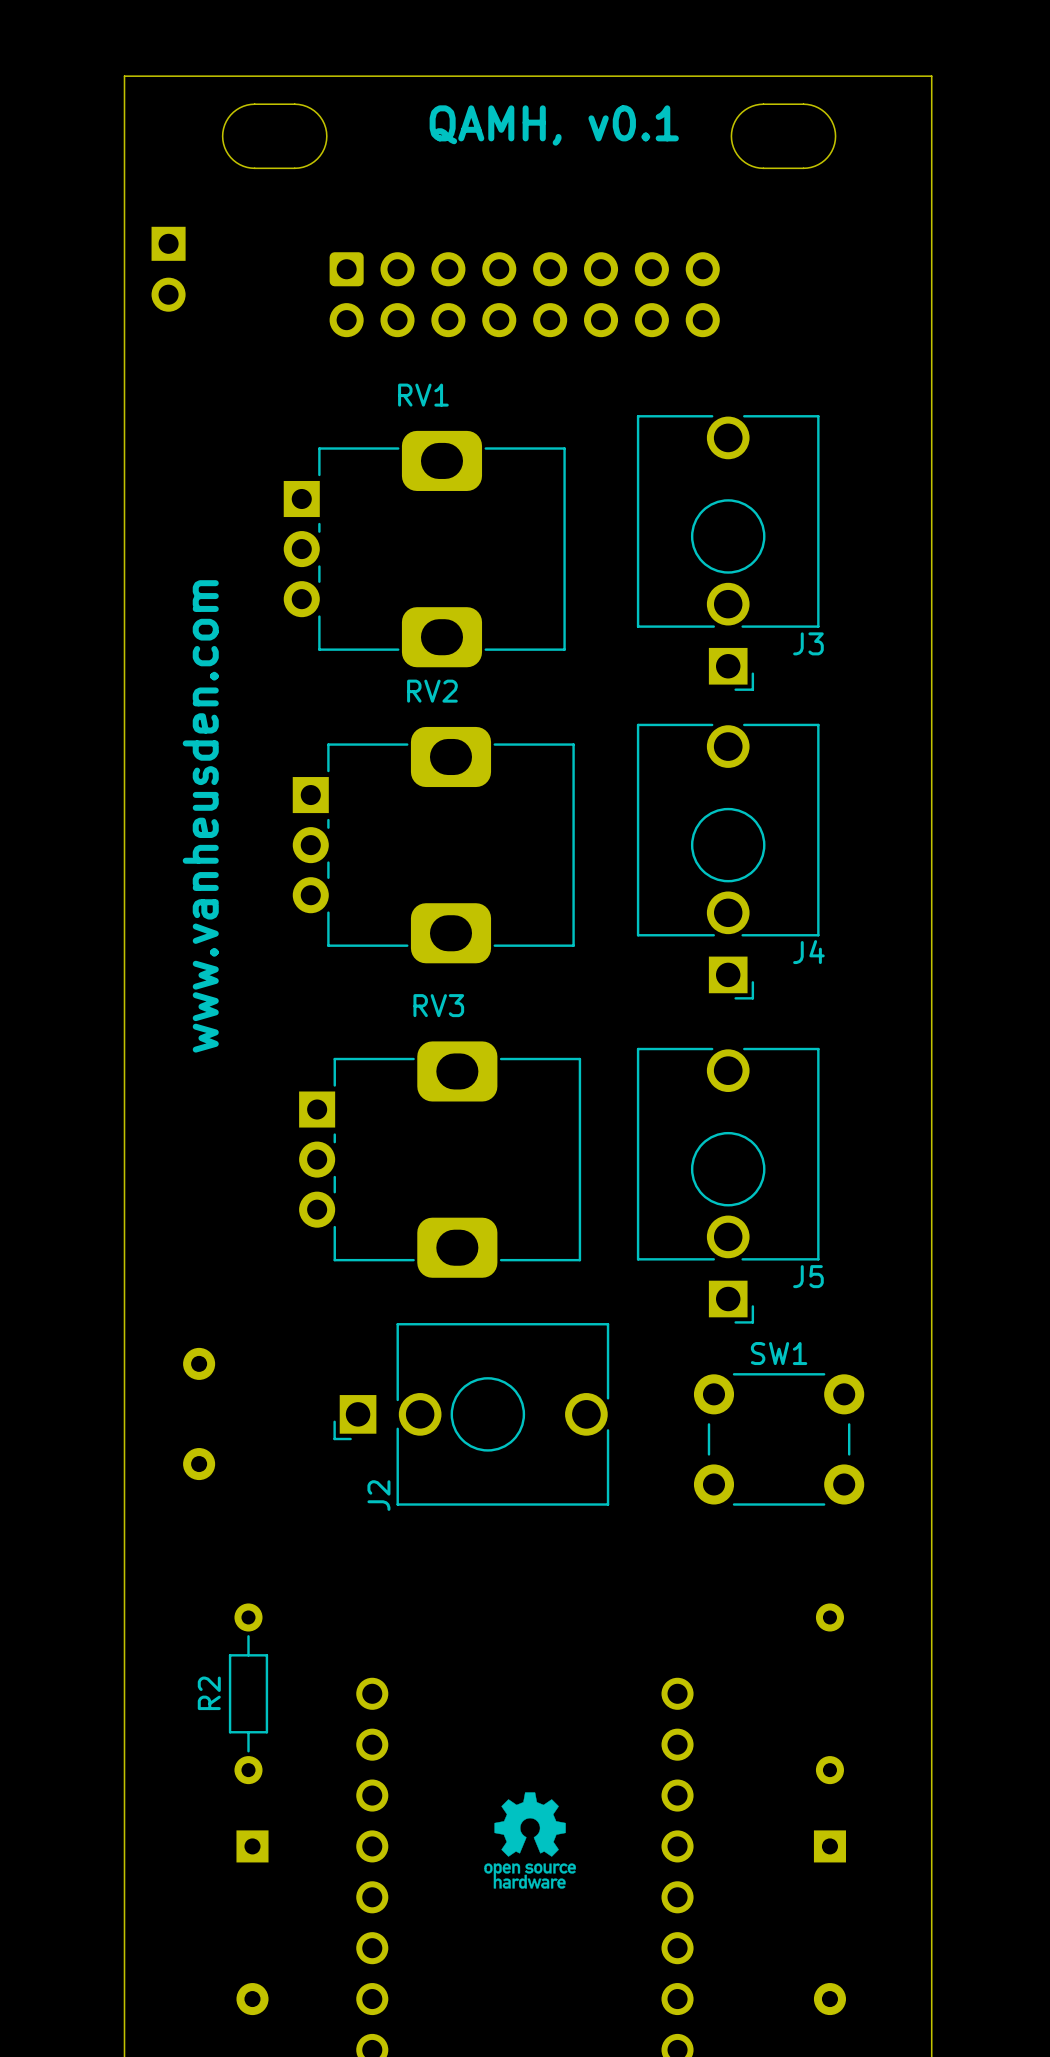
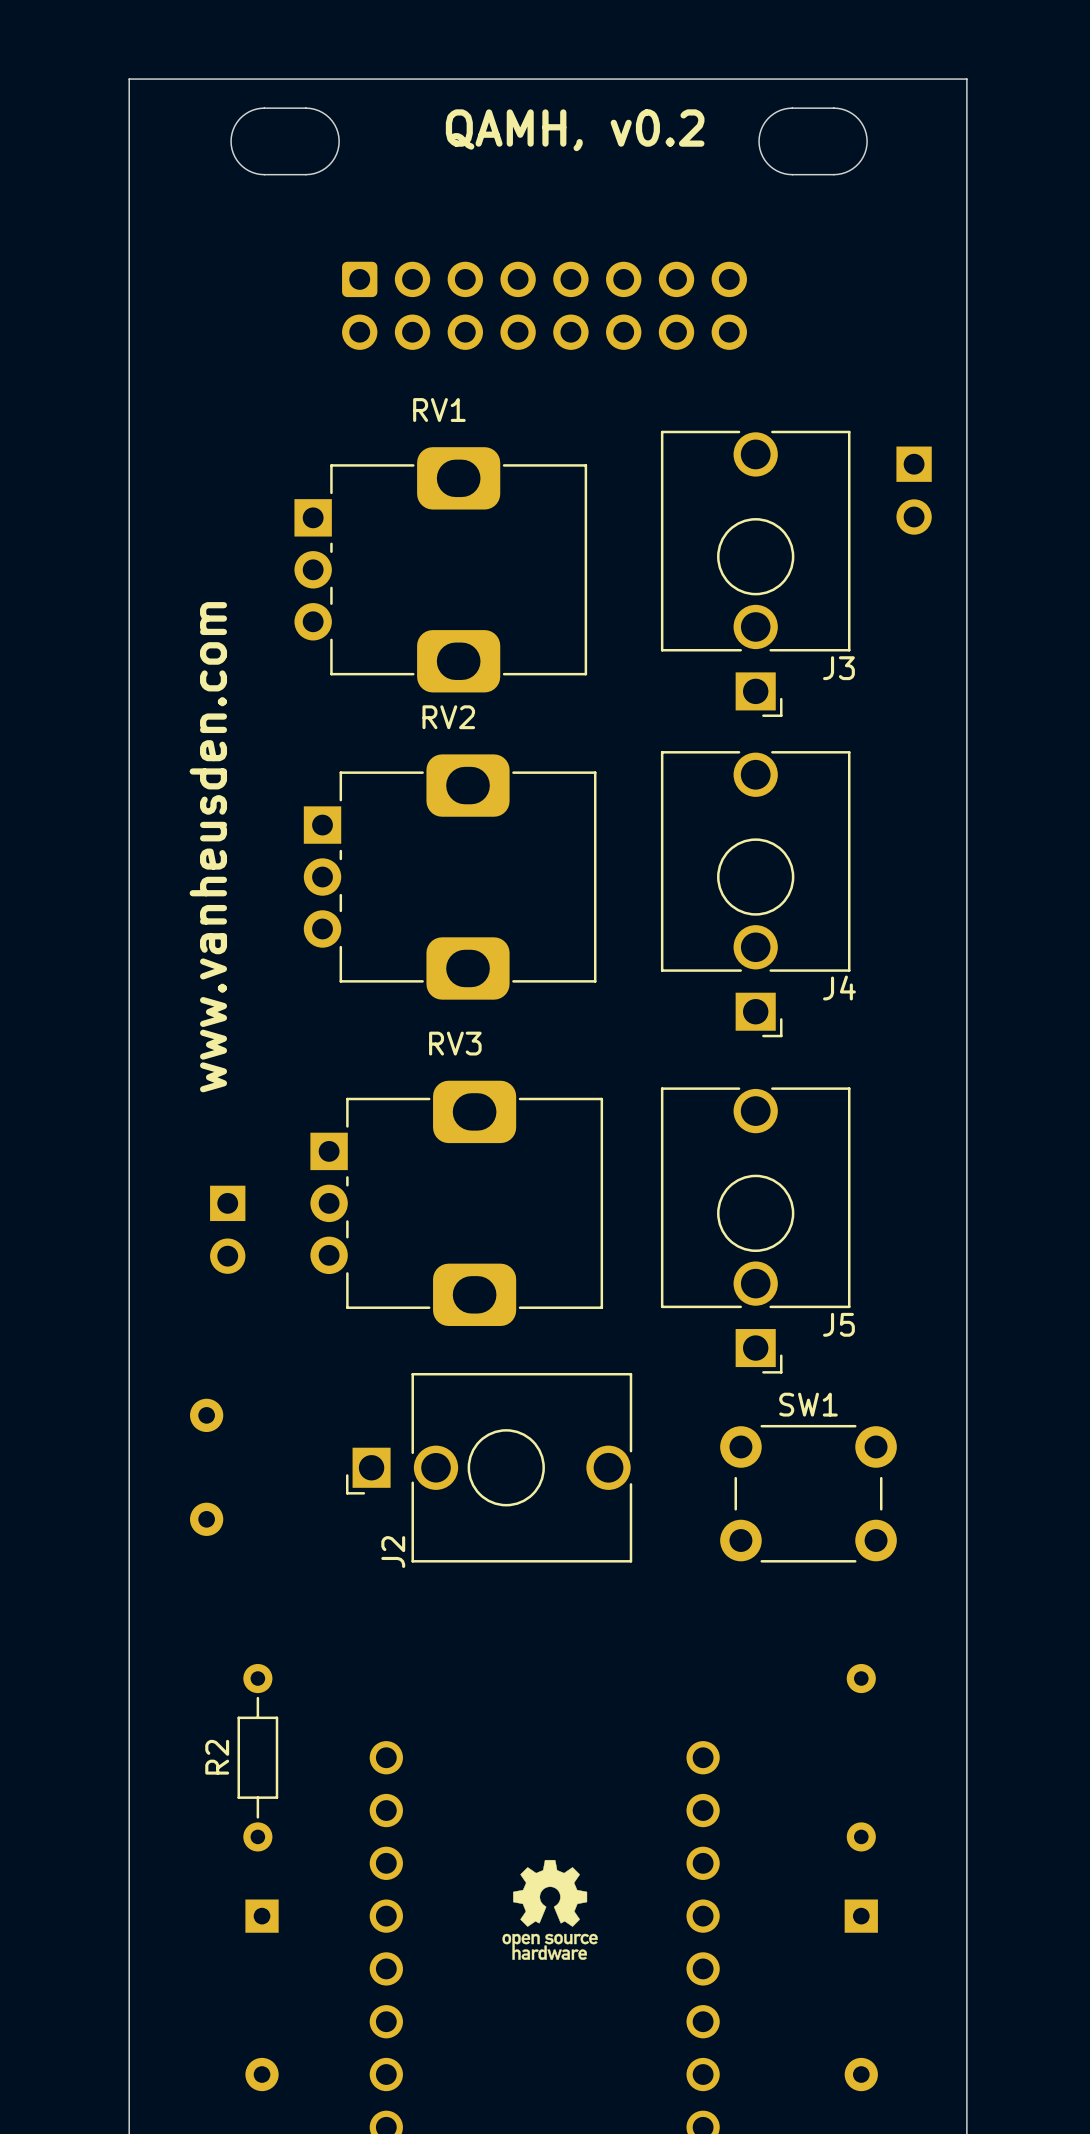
text: QAMH, v0.1 (554, 125) -> QAMH, v0.2 (575, 130)
part: (168, 269) -> none
part: none -> (914, 490)
part: none -> (227, 1229)

